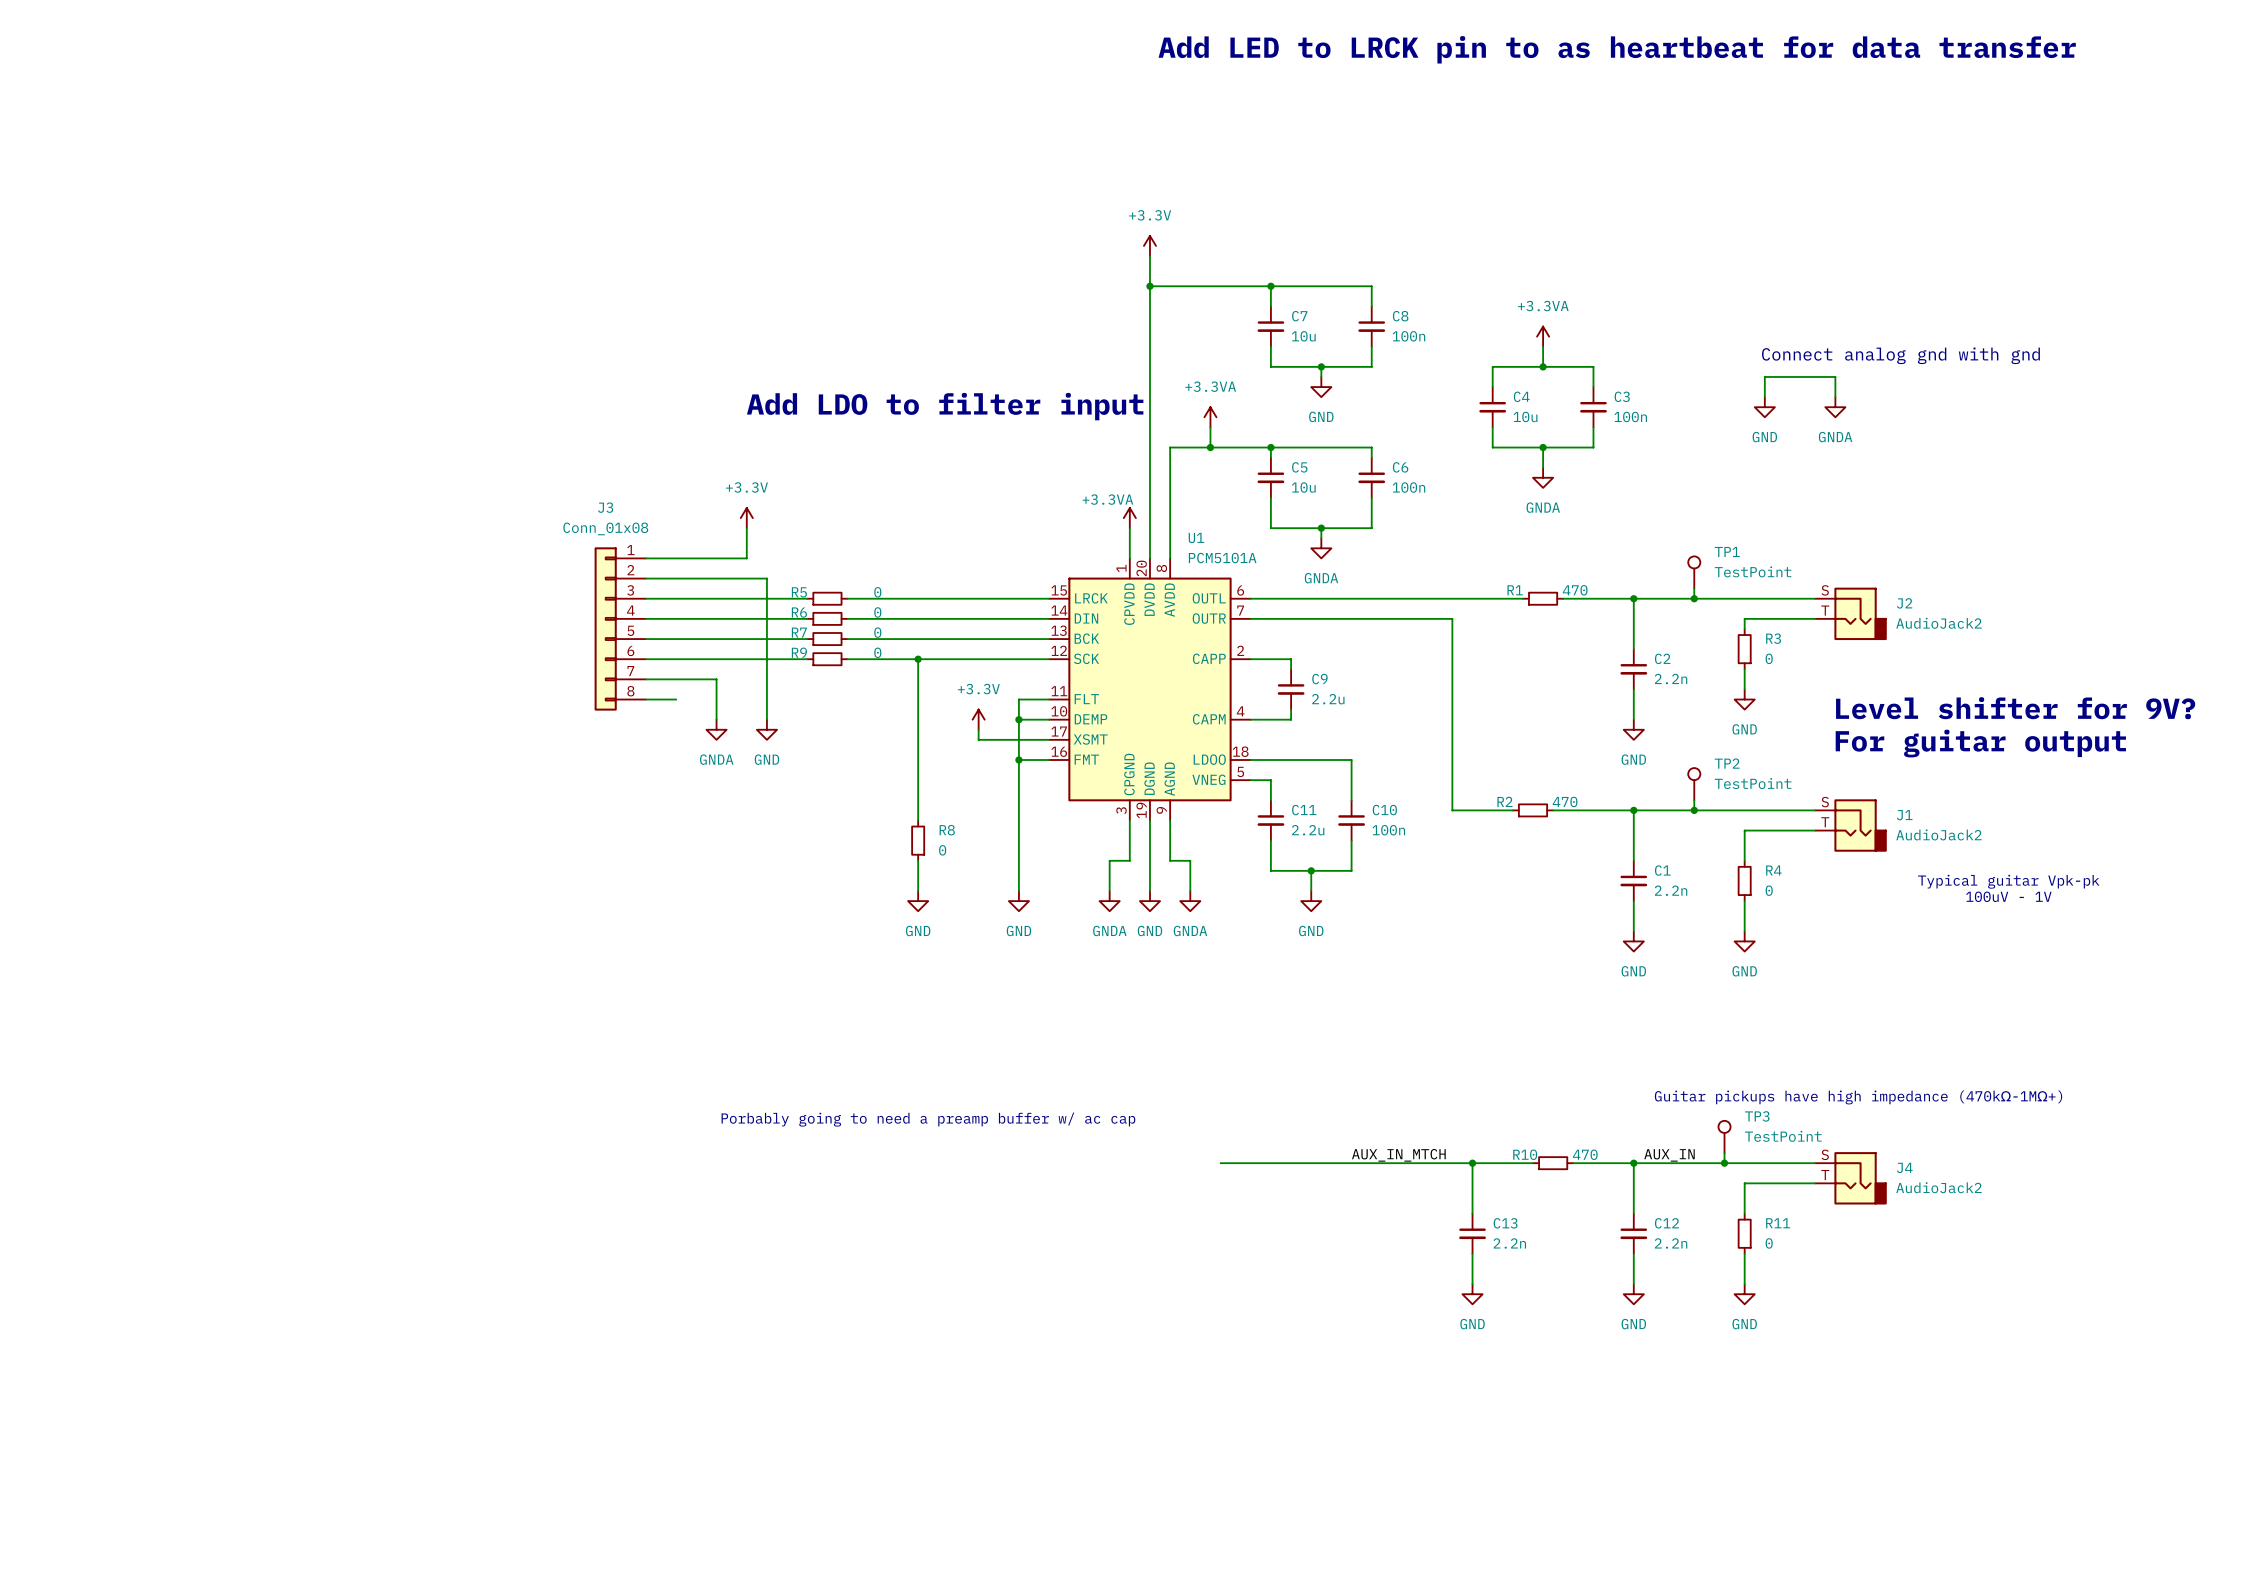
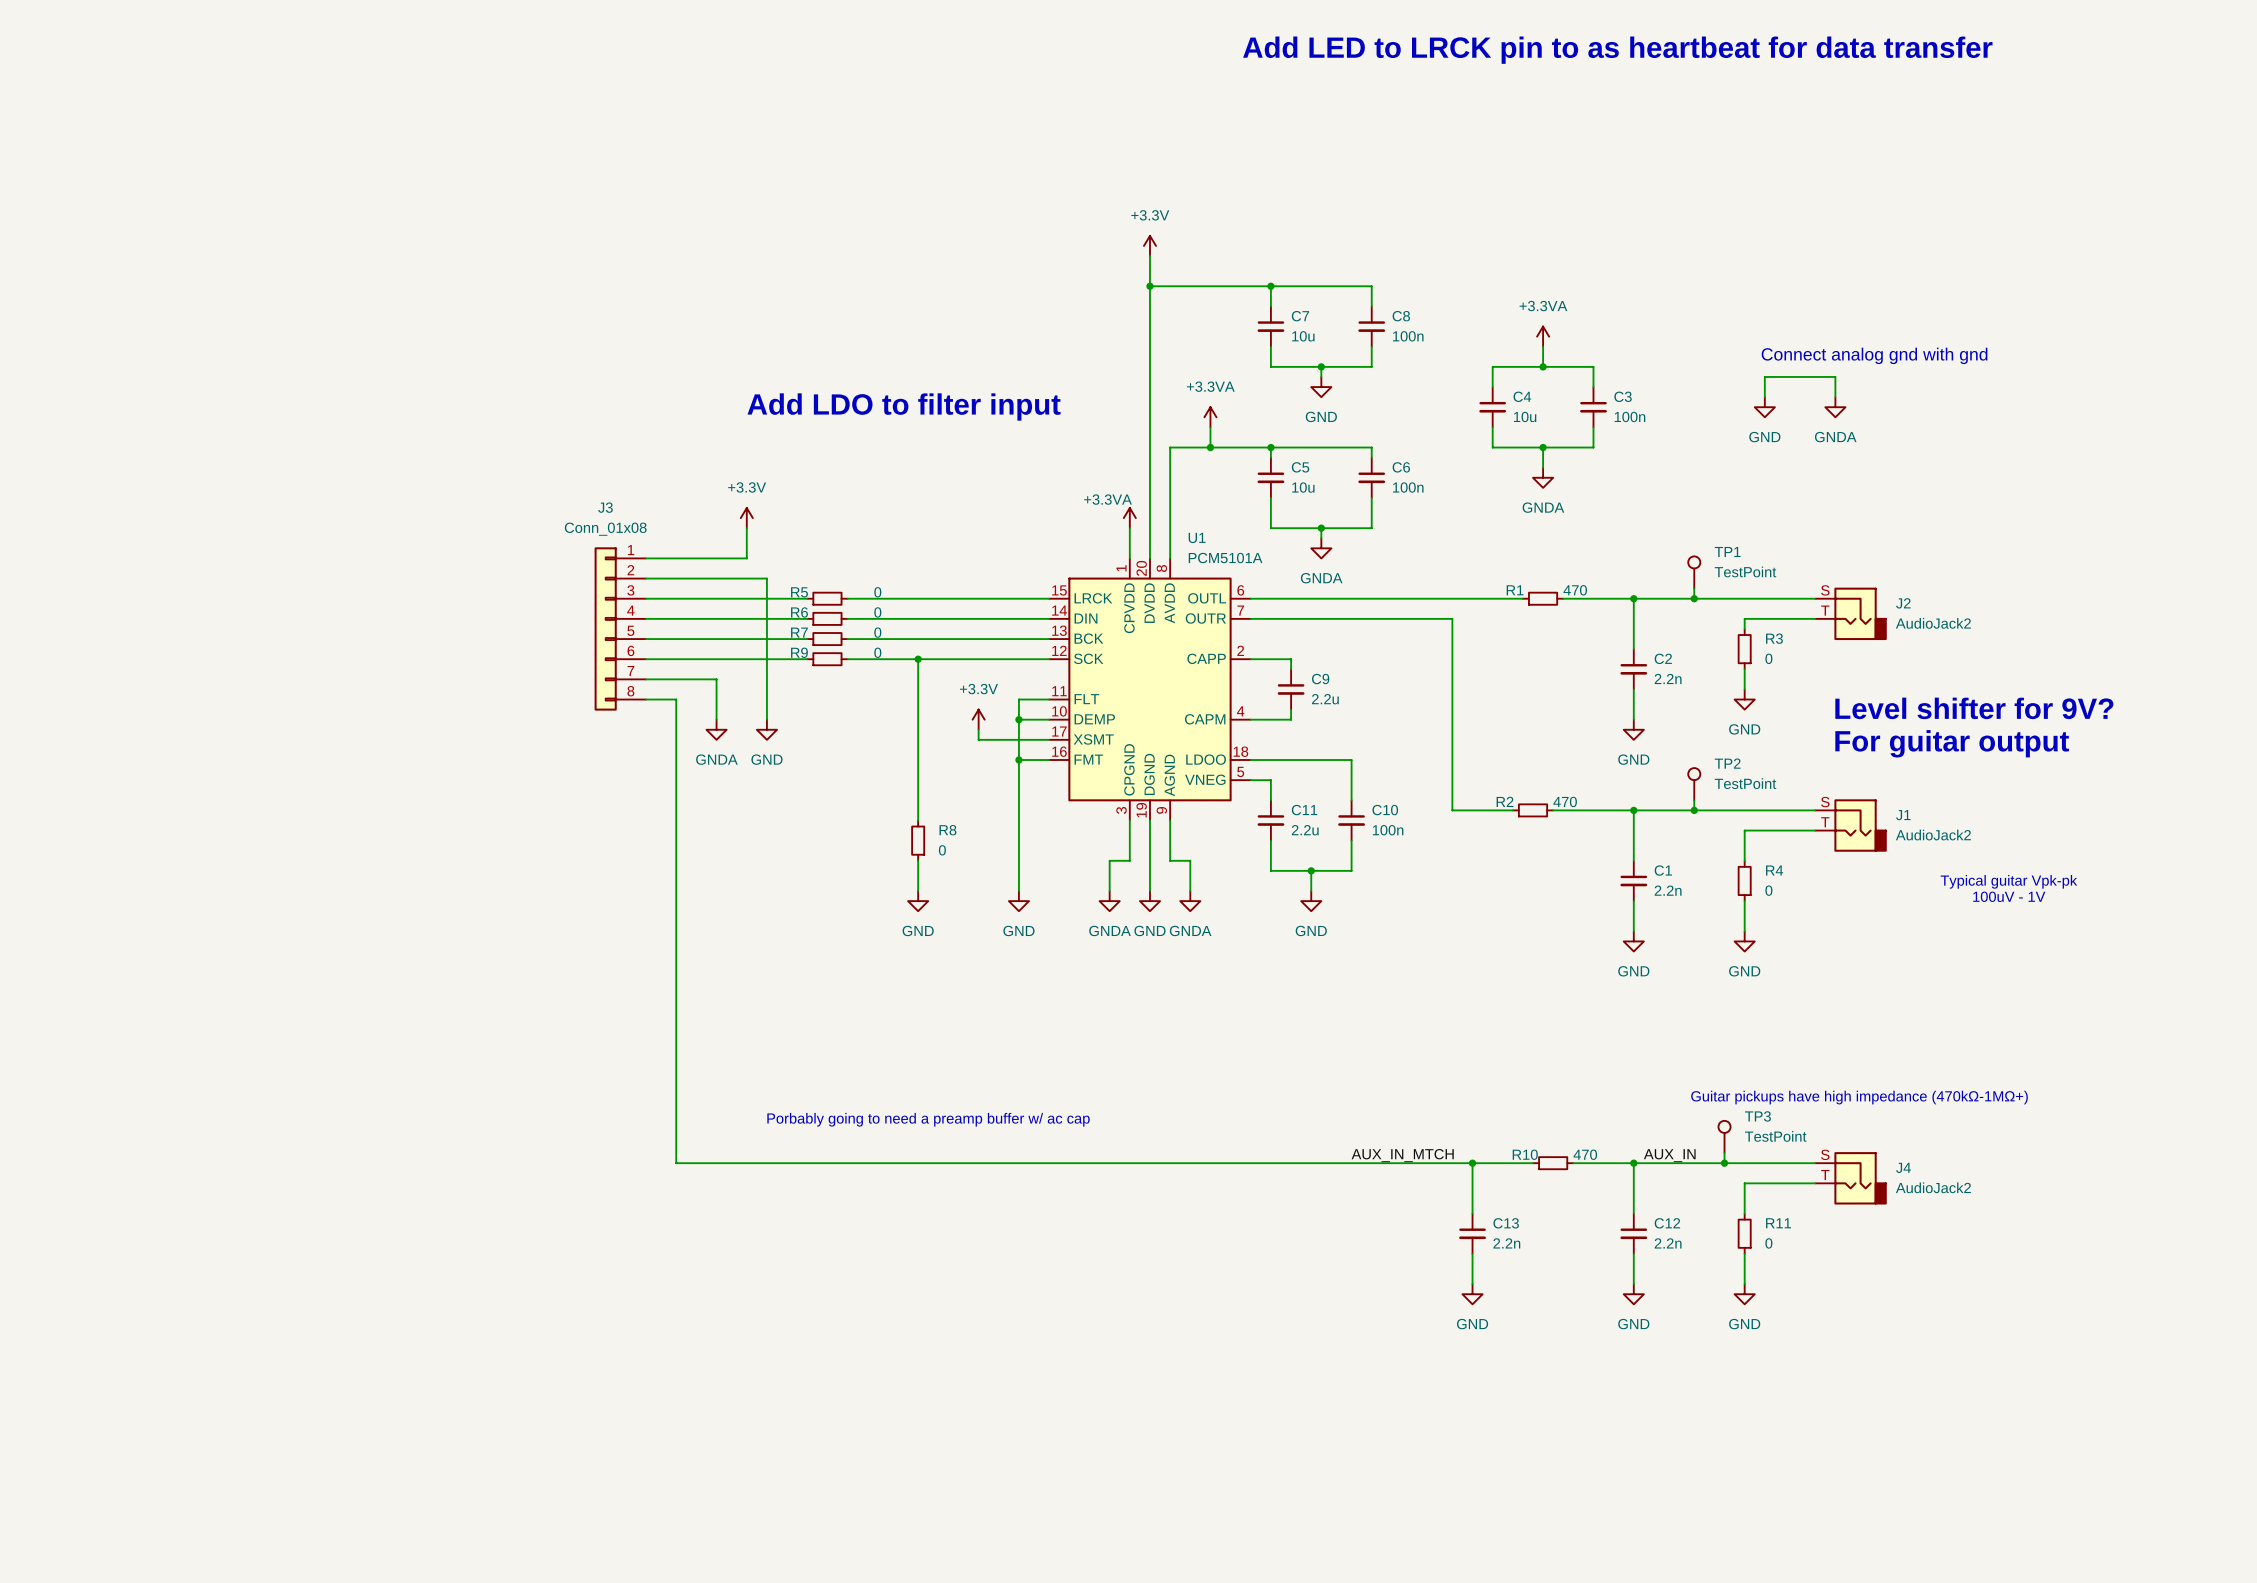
wire: none -> (676, 699) (676, 1163) (1220, 1163)

